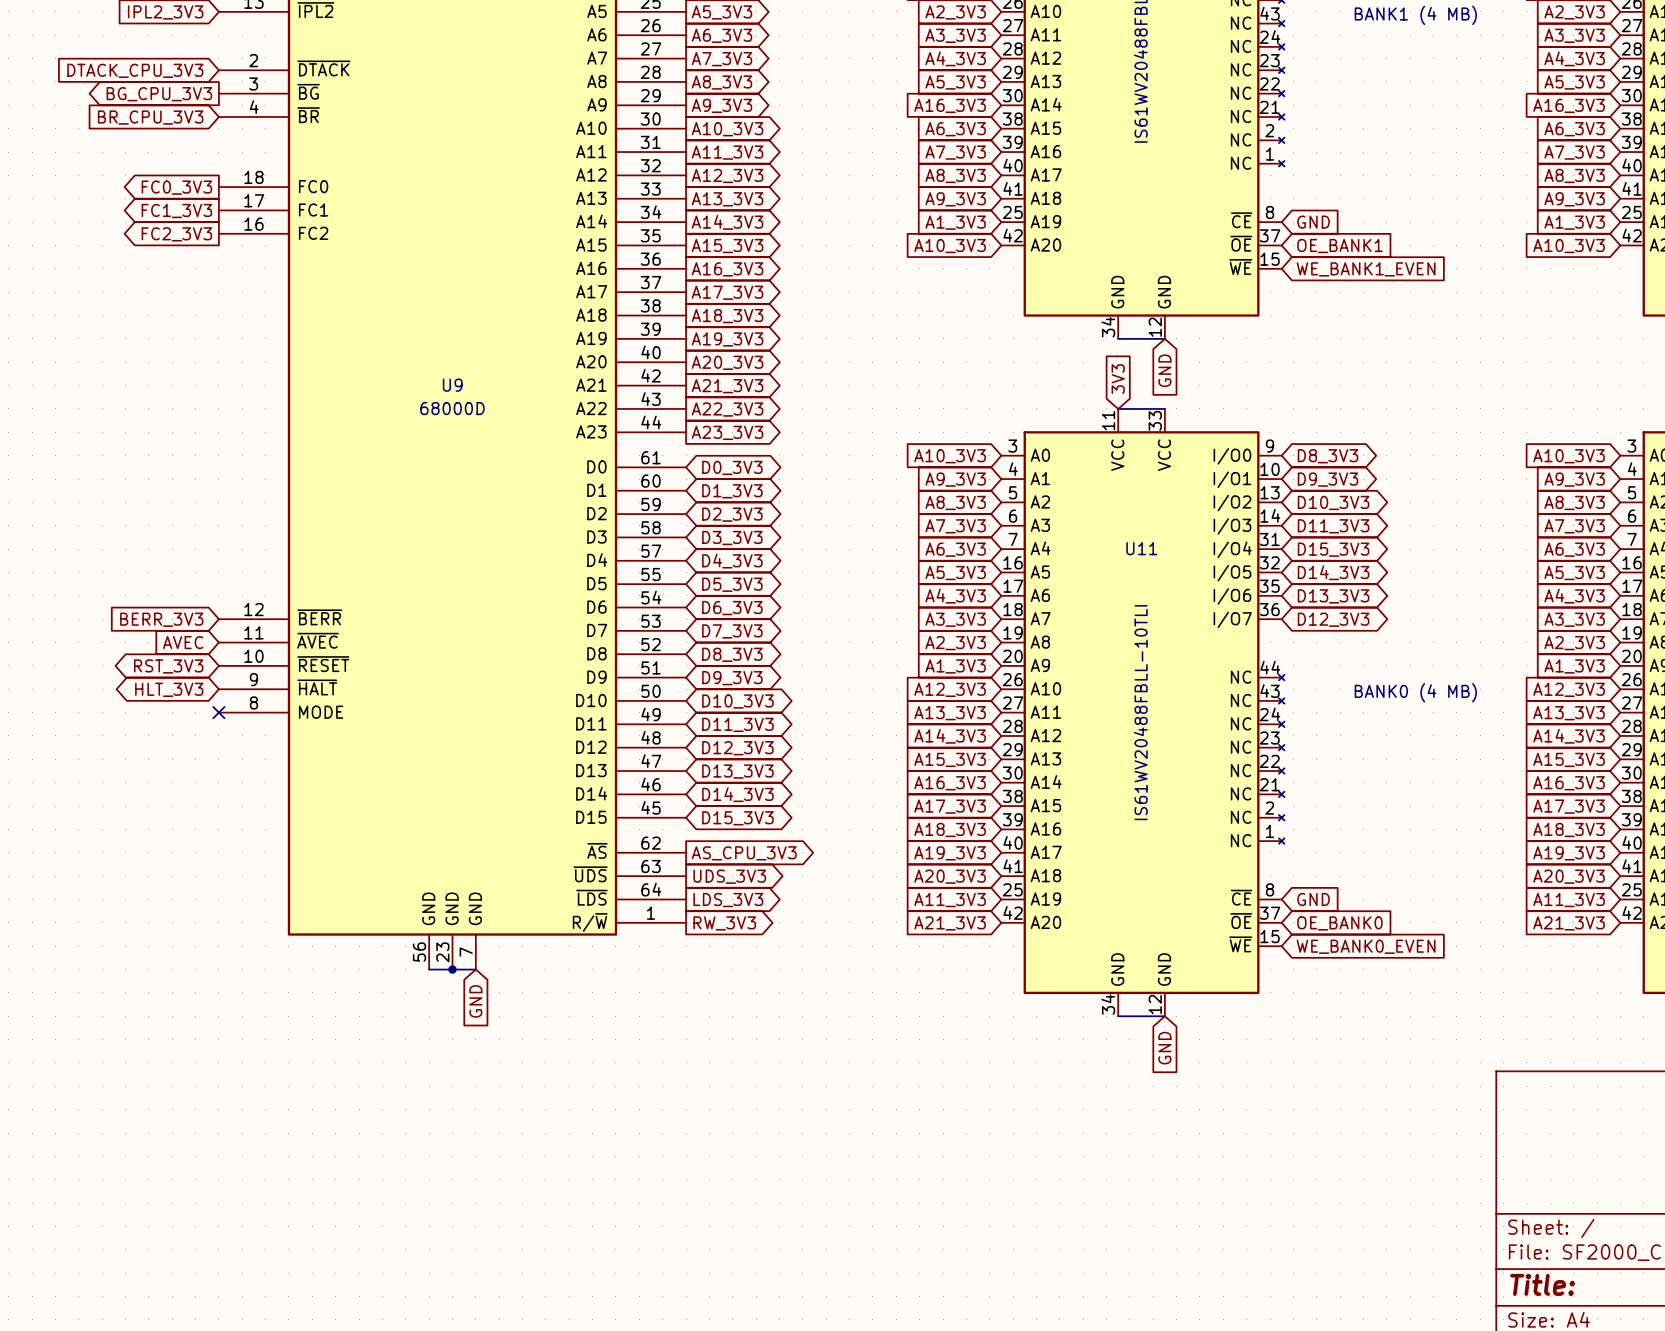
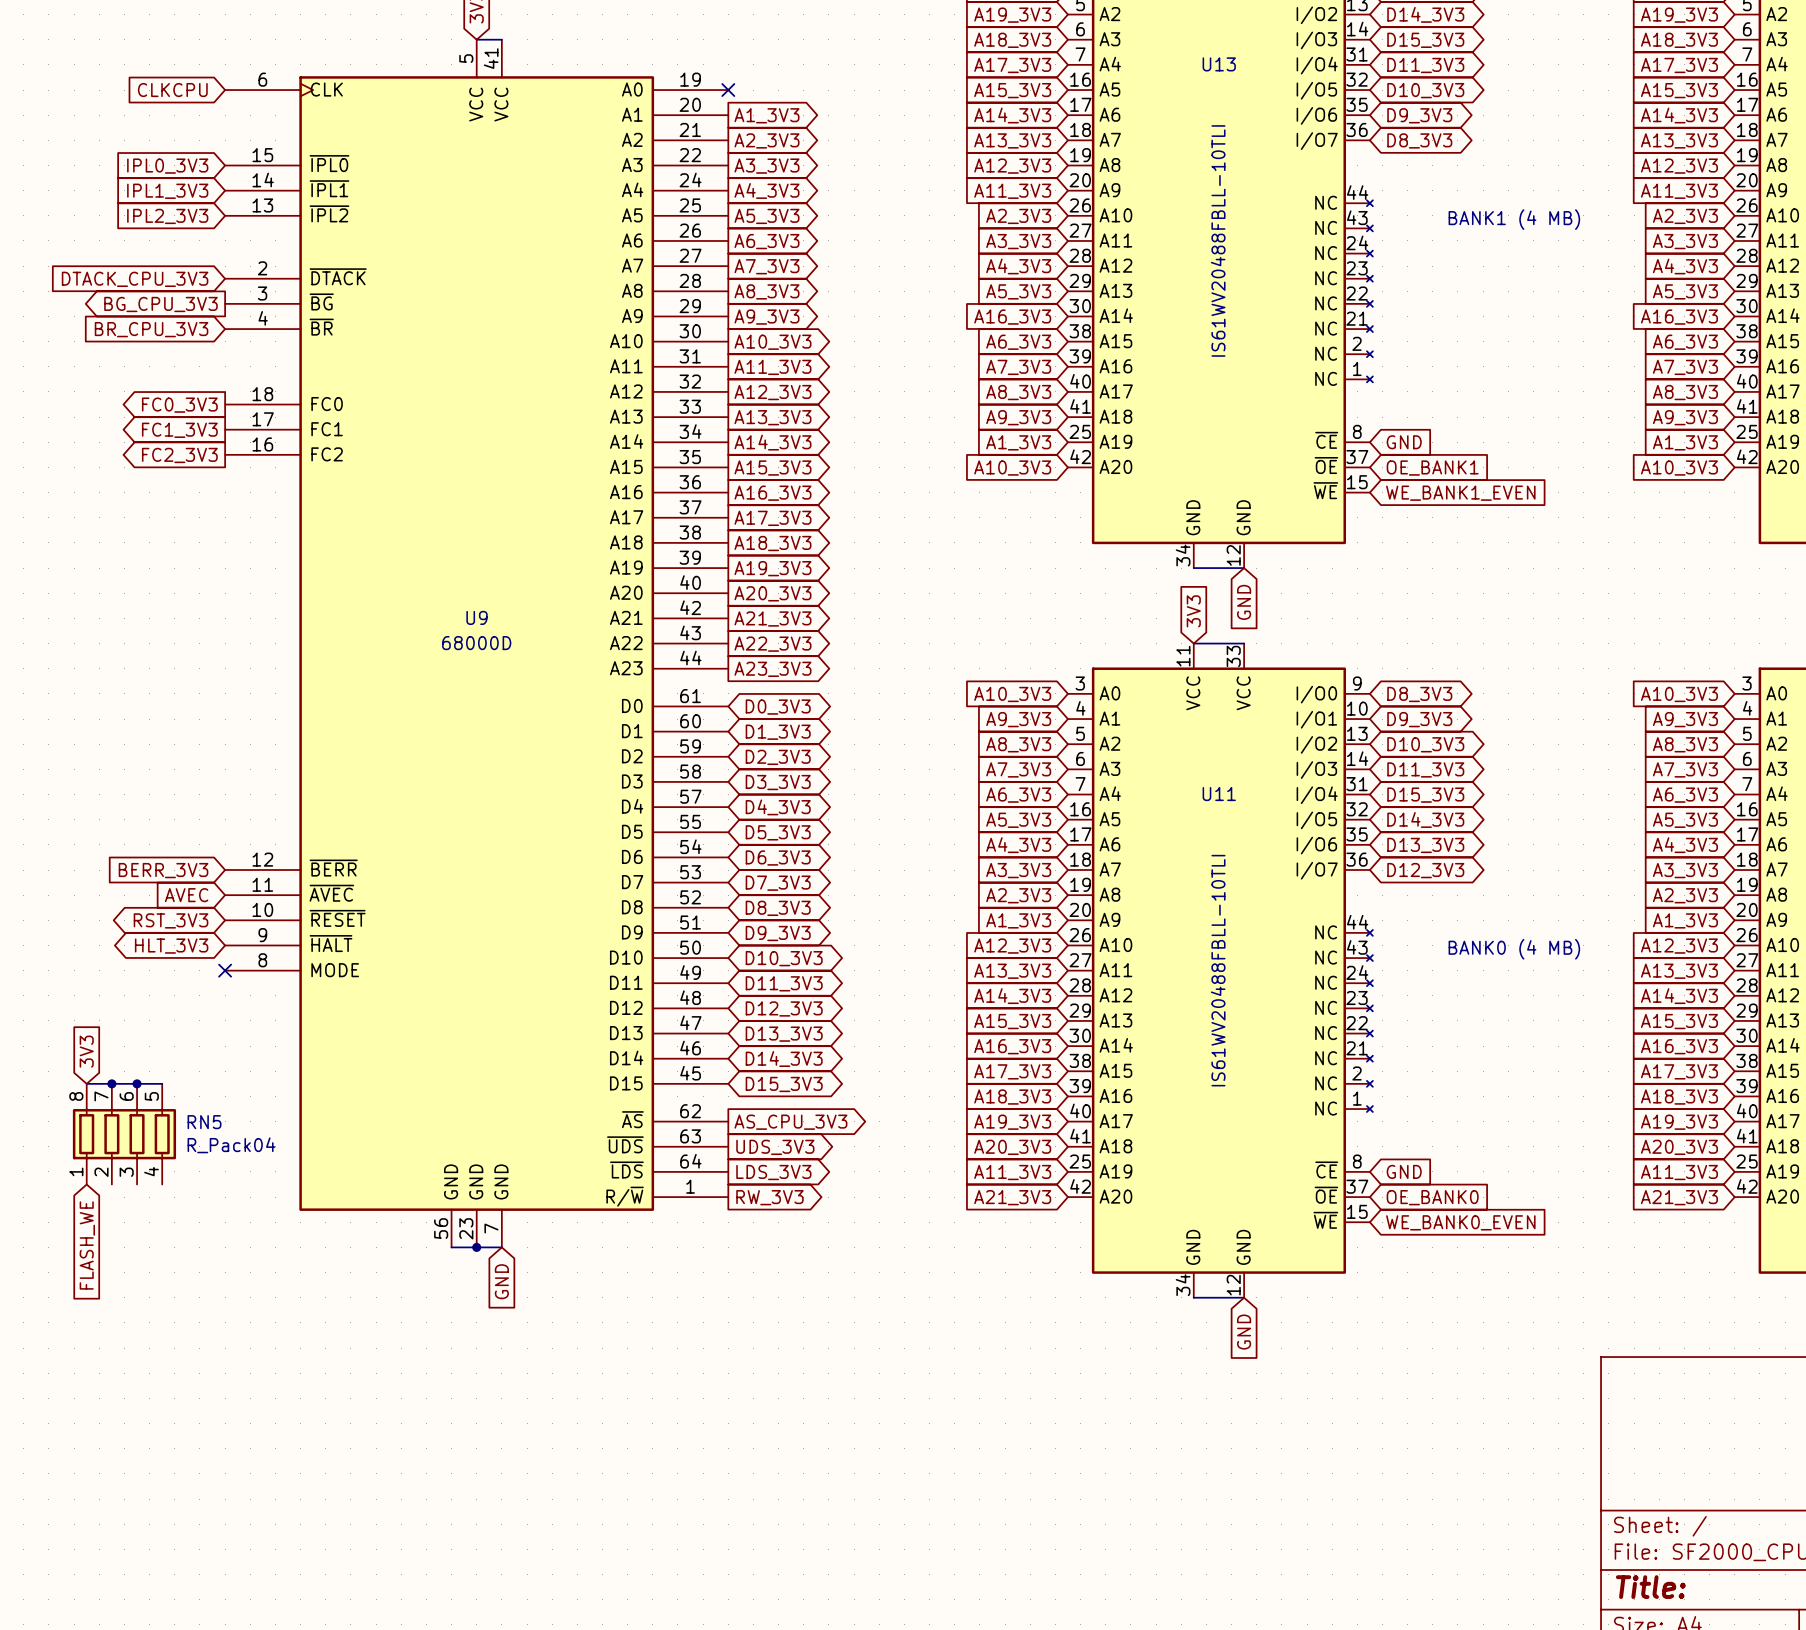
global label: none -> 3V3 (86, 1051)
wire: none -> (86, 1083) (162, 1083)
junction: none -> (111, 1083)
junction: none -> (137, 1083)
RN5: none -> R_Pack04 (124, 1134)
global label: none -> FLASH_WE (87, 1245)

